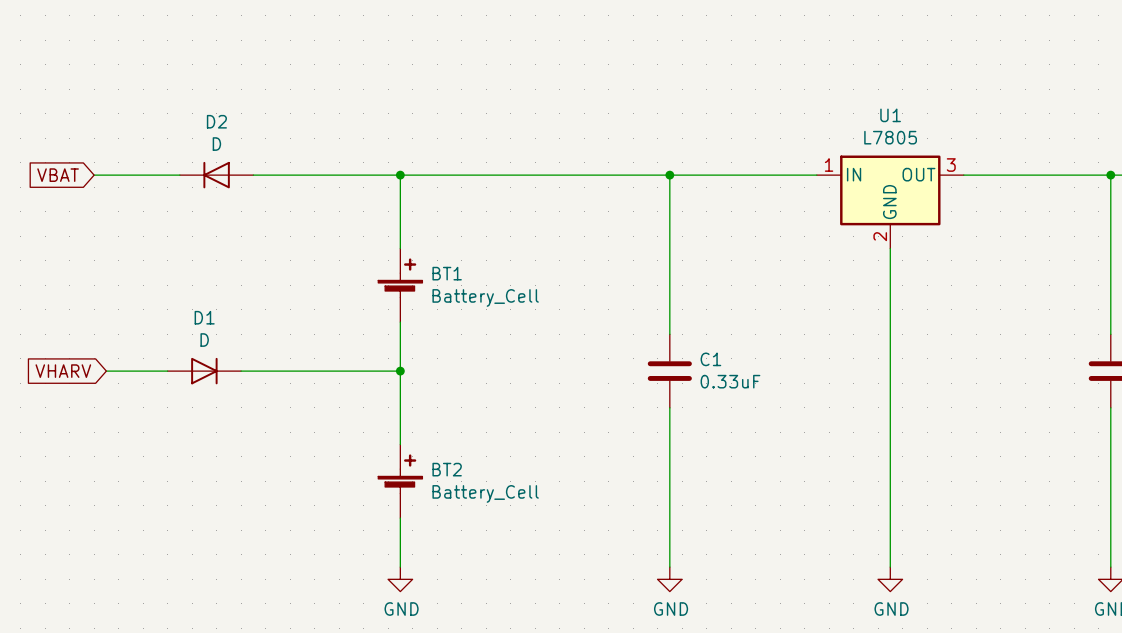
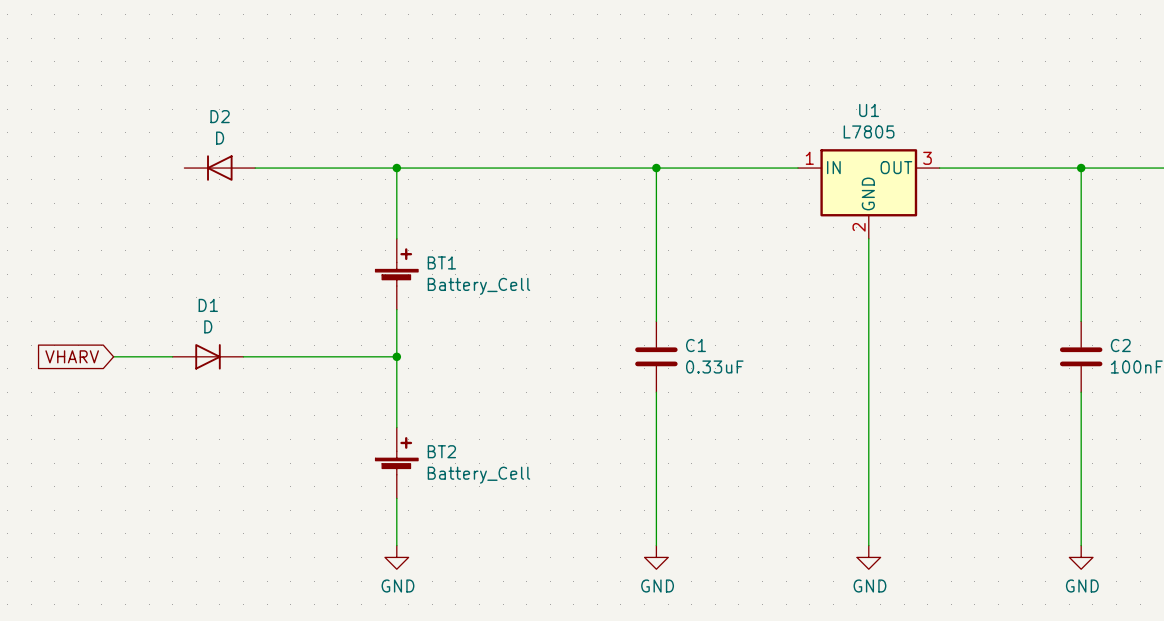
global label: VBAT (58, 175) -> none
wire: (94, 175) (179, 175) -> none

